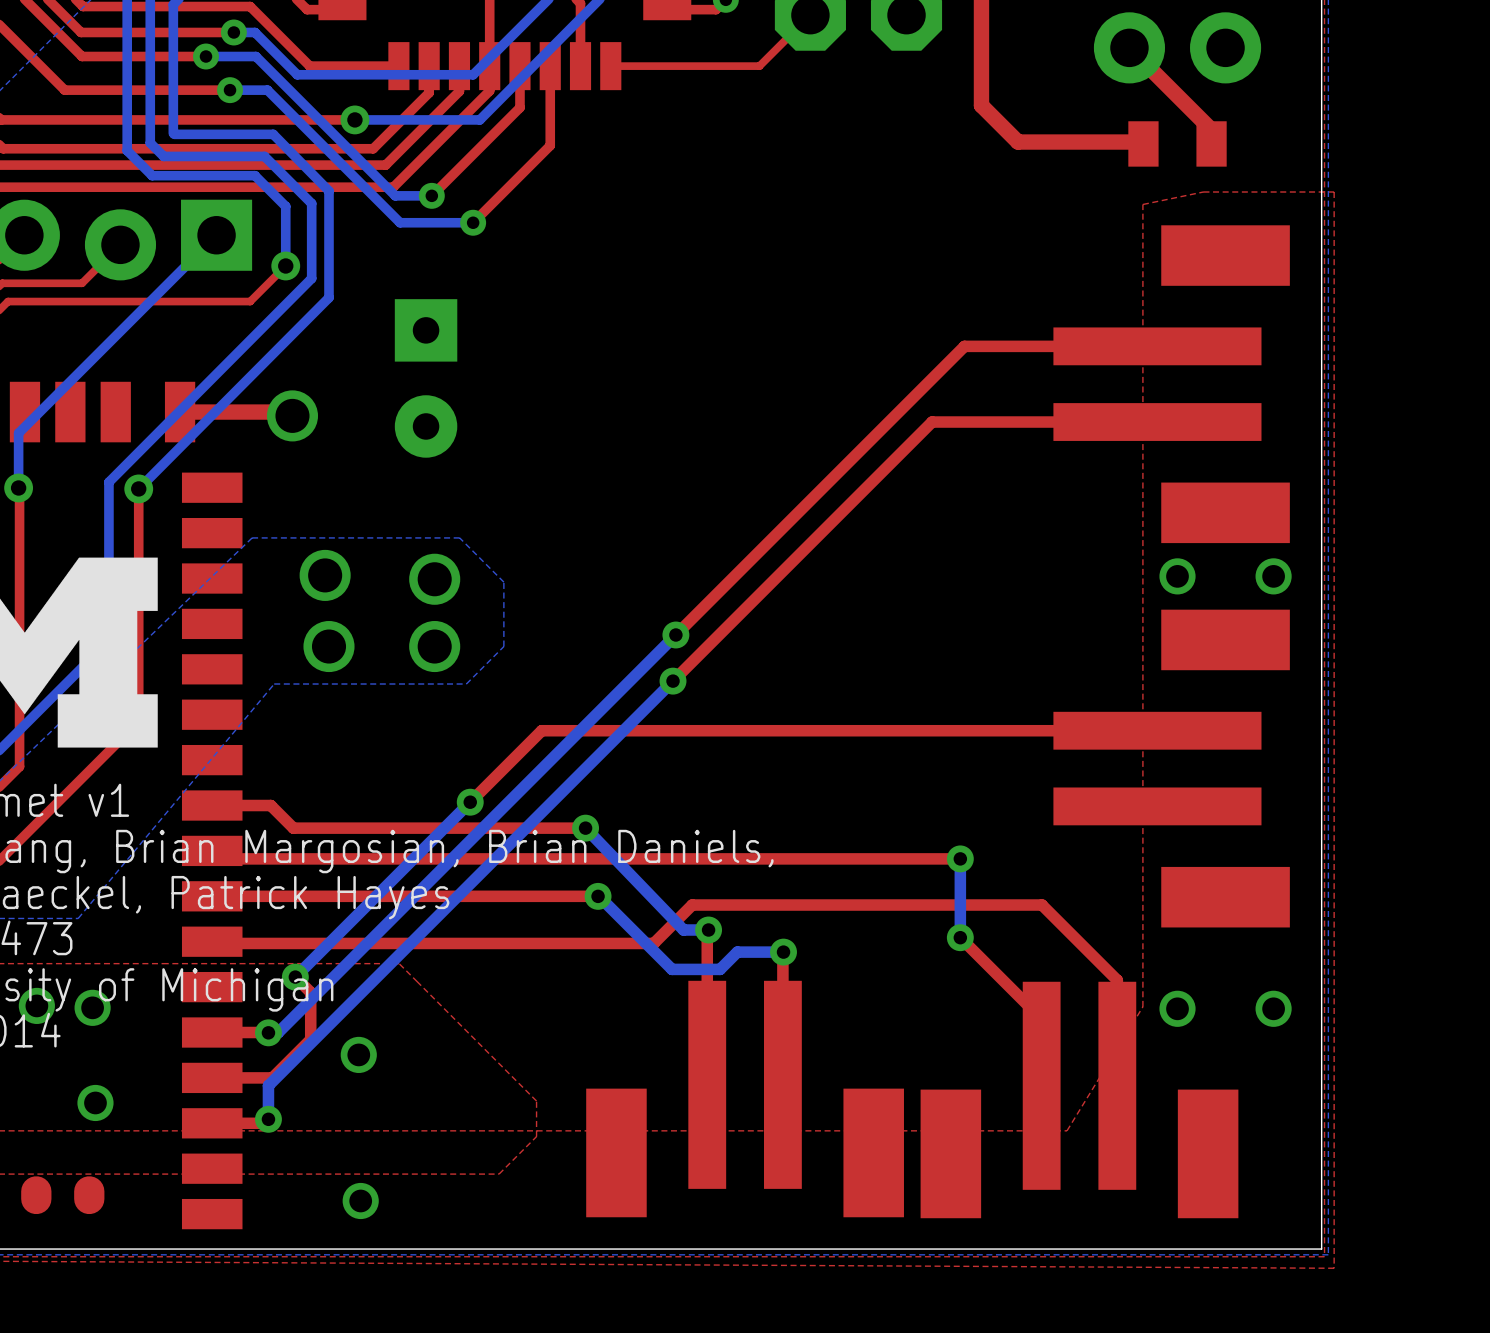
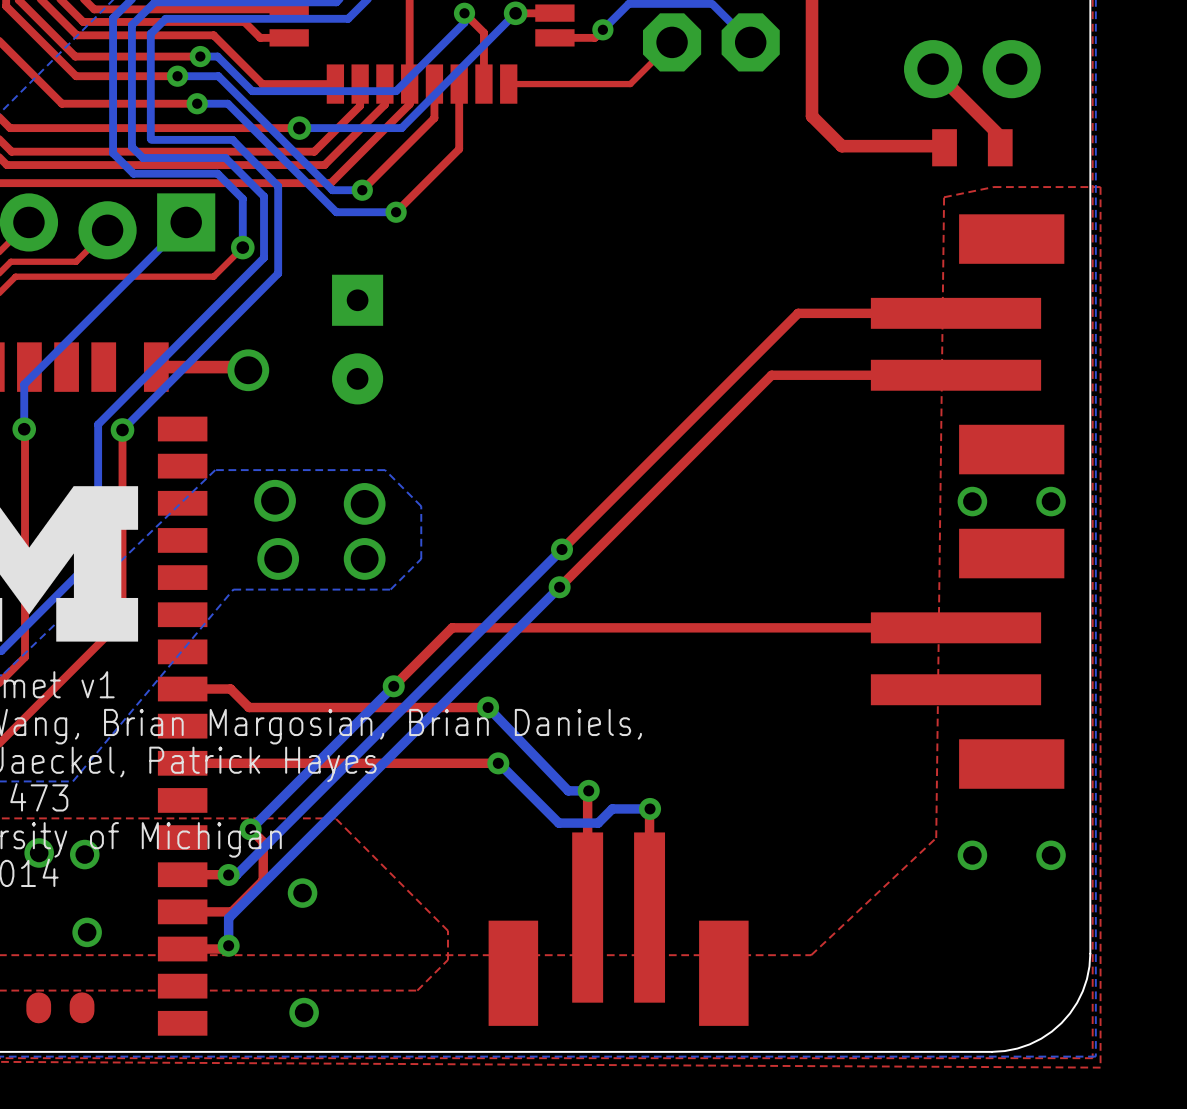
top zone outline: (1142, 204) (1142, 1006) (1067, 1130) (980, 1130) -> (944, 197) (936, 838) (811, 955)
top track: (212, 850) (220, 858) (960, 858) -> none
bottom track: (960, 858) (960, 937) -> none
via: (960, 858) -> none
top track: (960, 937) (1041, 1019) (1041, 1085) -> none
via: (960, 937) -> none
top track: (212, 941) (213, 943) (653, 943) (692, 905) (1042, 905) (1117, 980) (1117, 1085) -> none
part: (1079, 1099) -> none
board edge: (1321, 1128) (1321, 1249) (1201, 1249) -> (1090, 953) (1086, 979) (1082, 991) (1077, 1002) (1061, 1023) (1041, 1038) (1029, 1044) (1017, 1048) (992, 1051)

